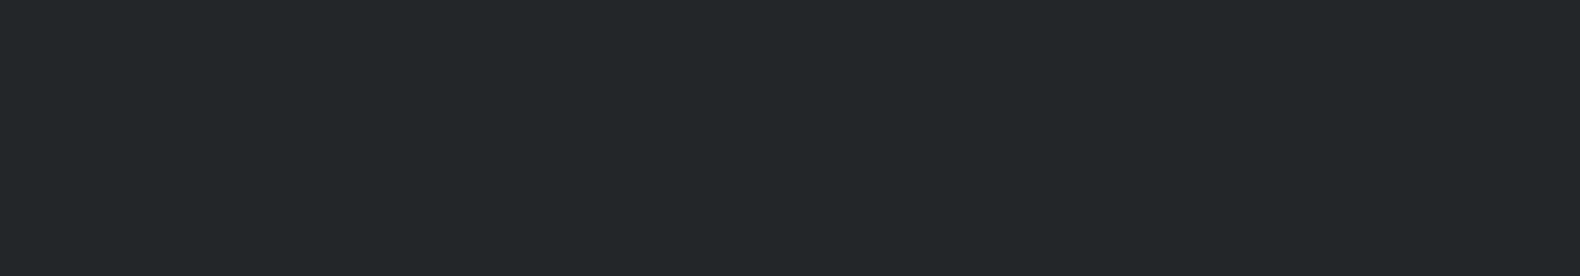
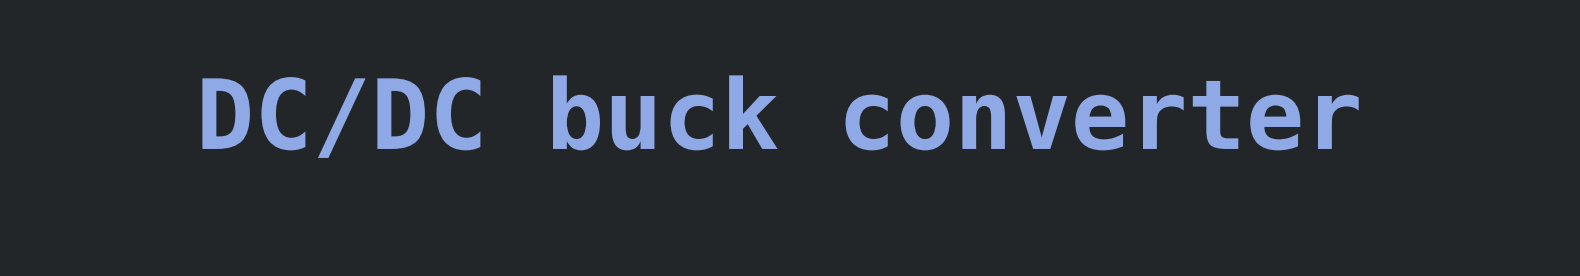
text: none -> DC/DC buck converter (780, 116)

